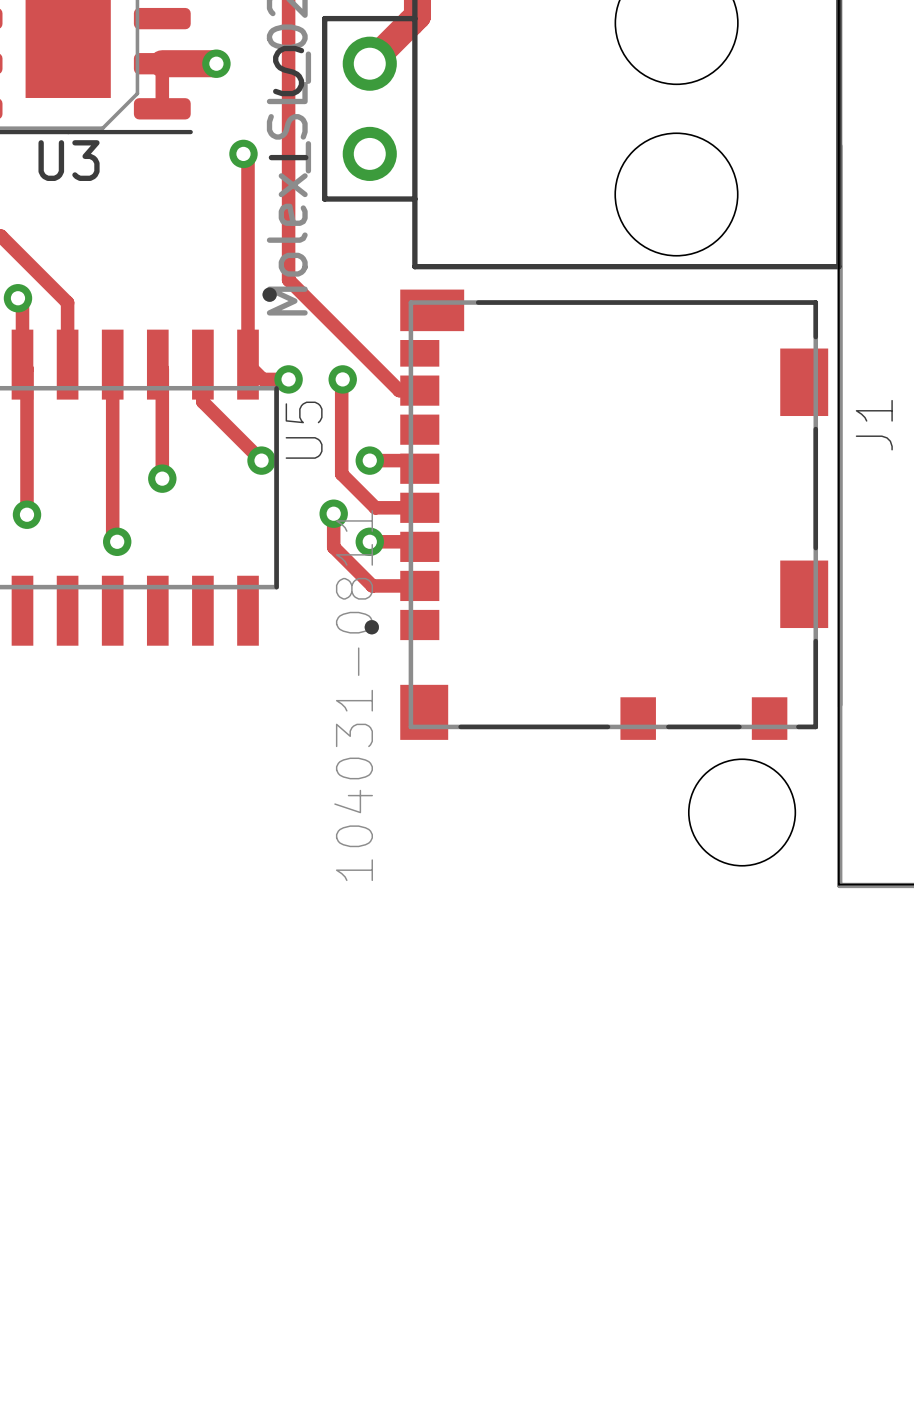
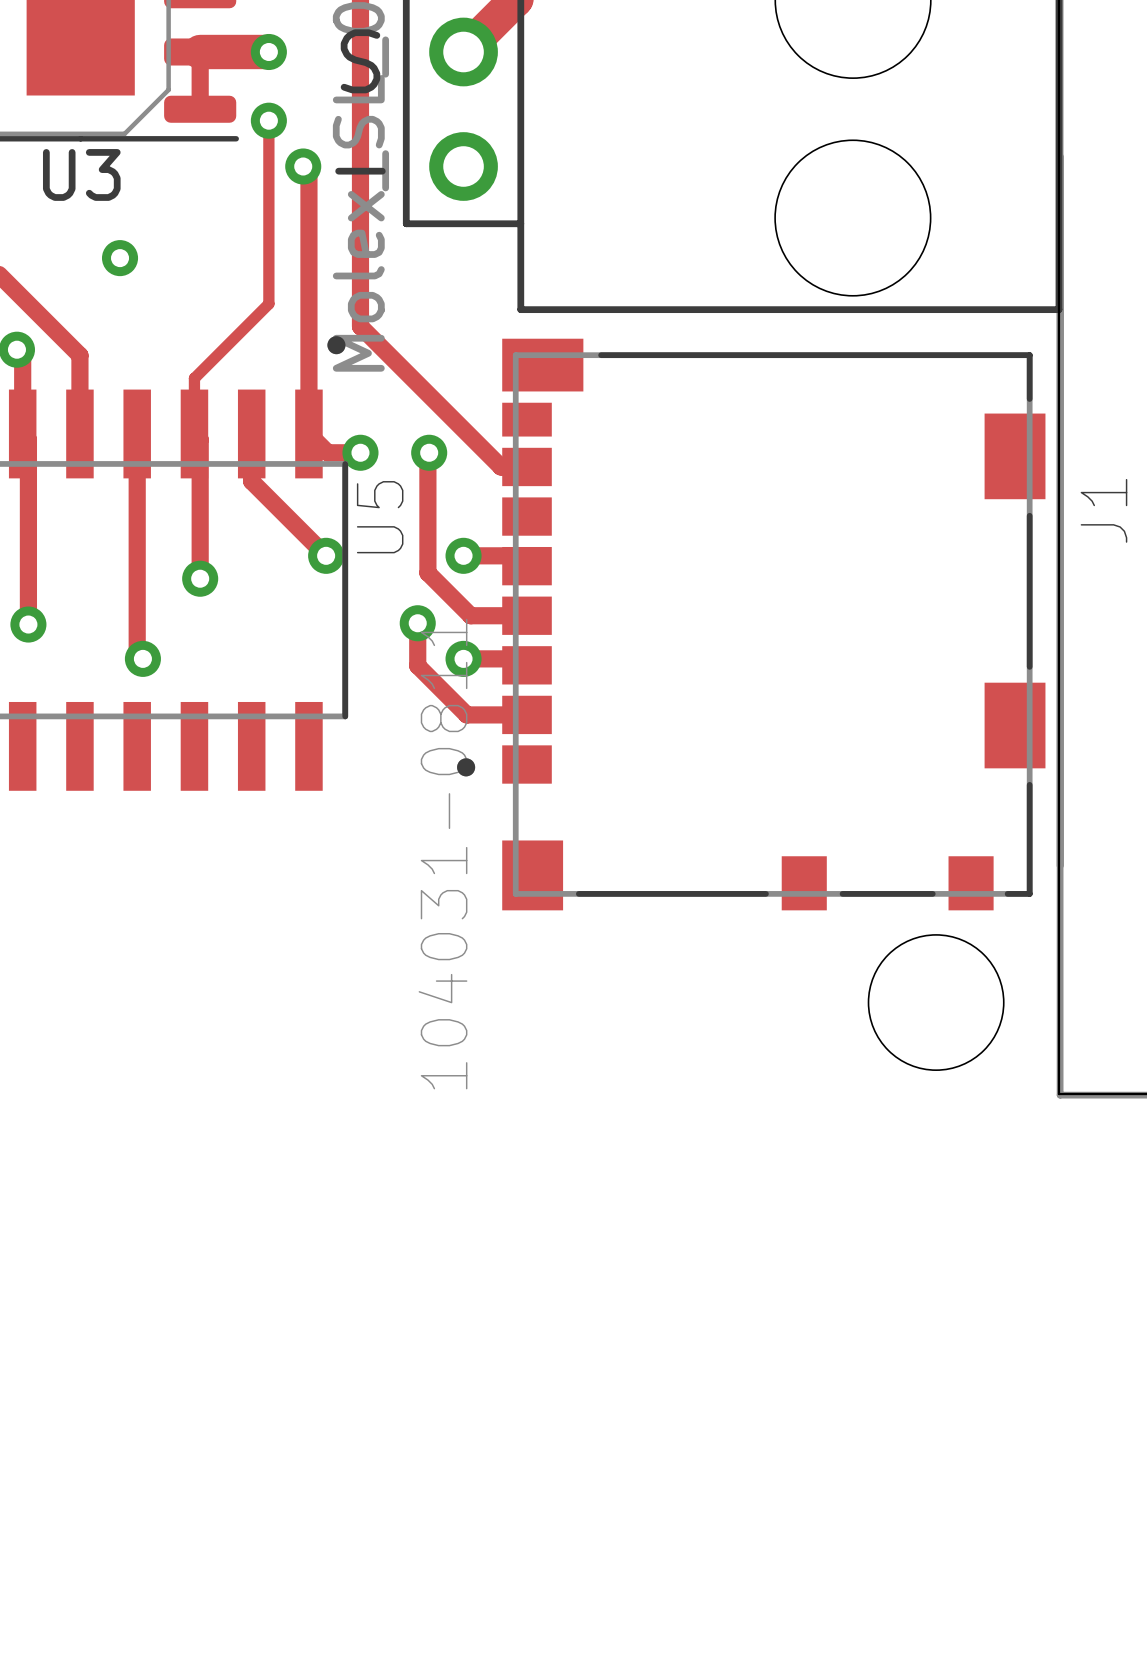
track: none -> (268, 120) (268, 303) (194, 378) (194, 433)
via: none -> (268, 120)
via: none -> (120, 258)

